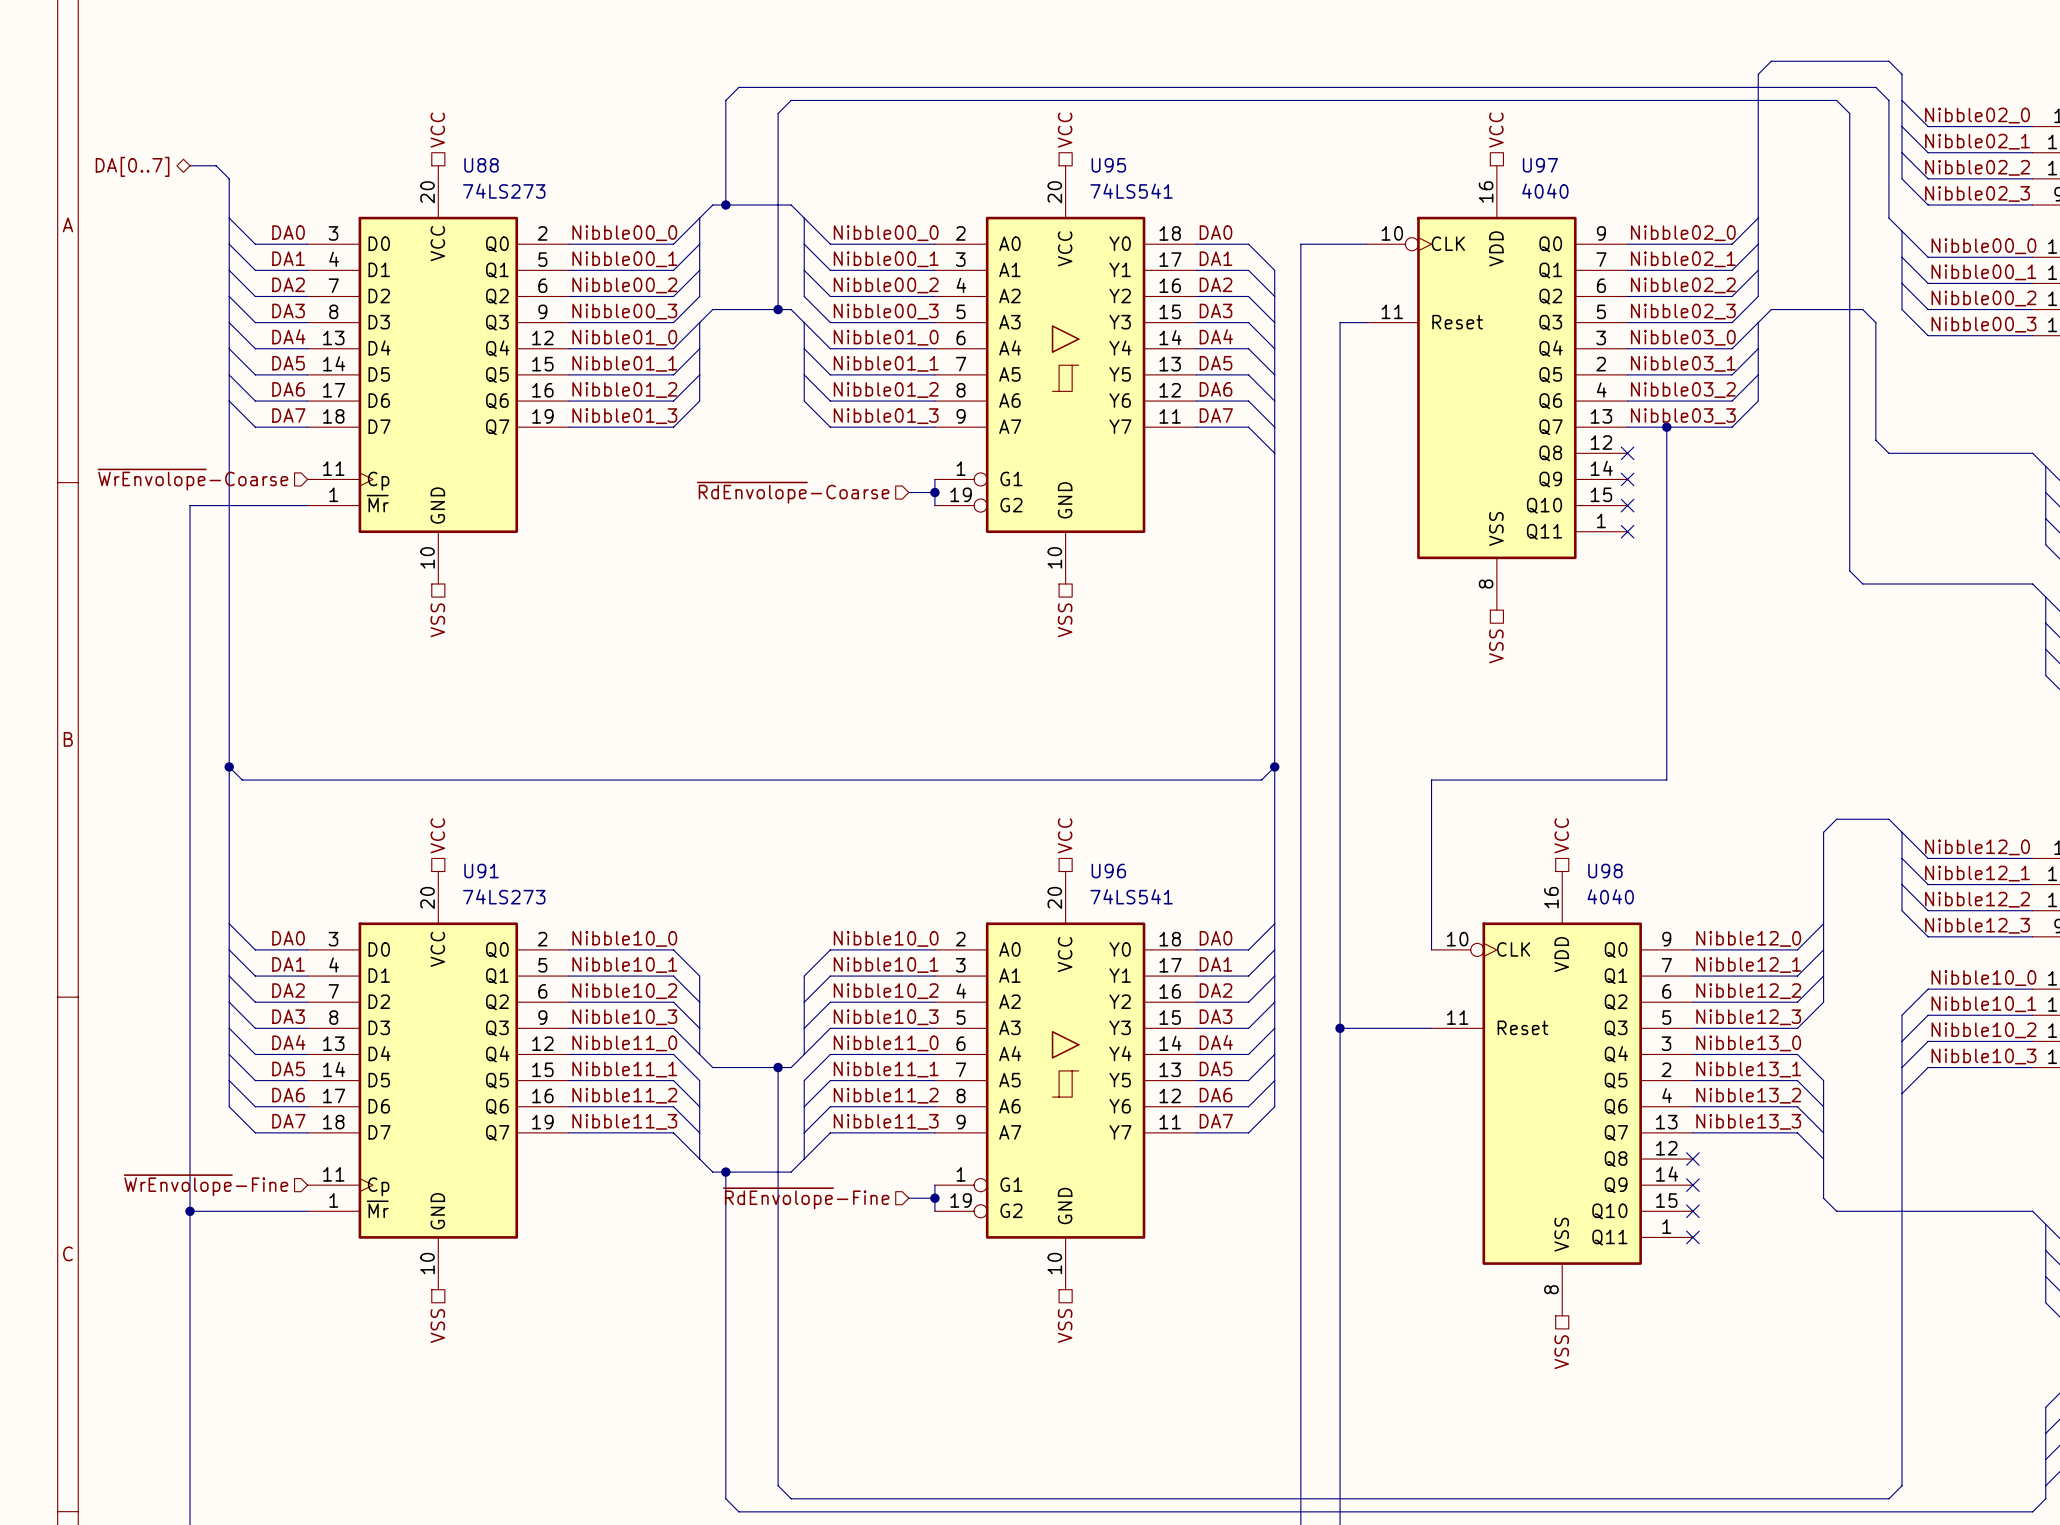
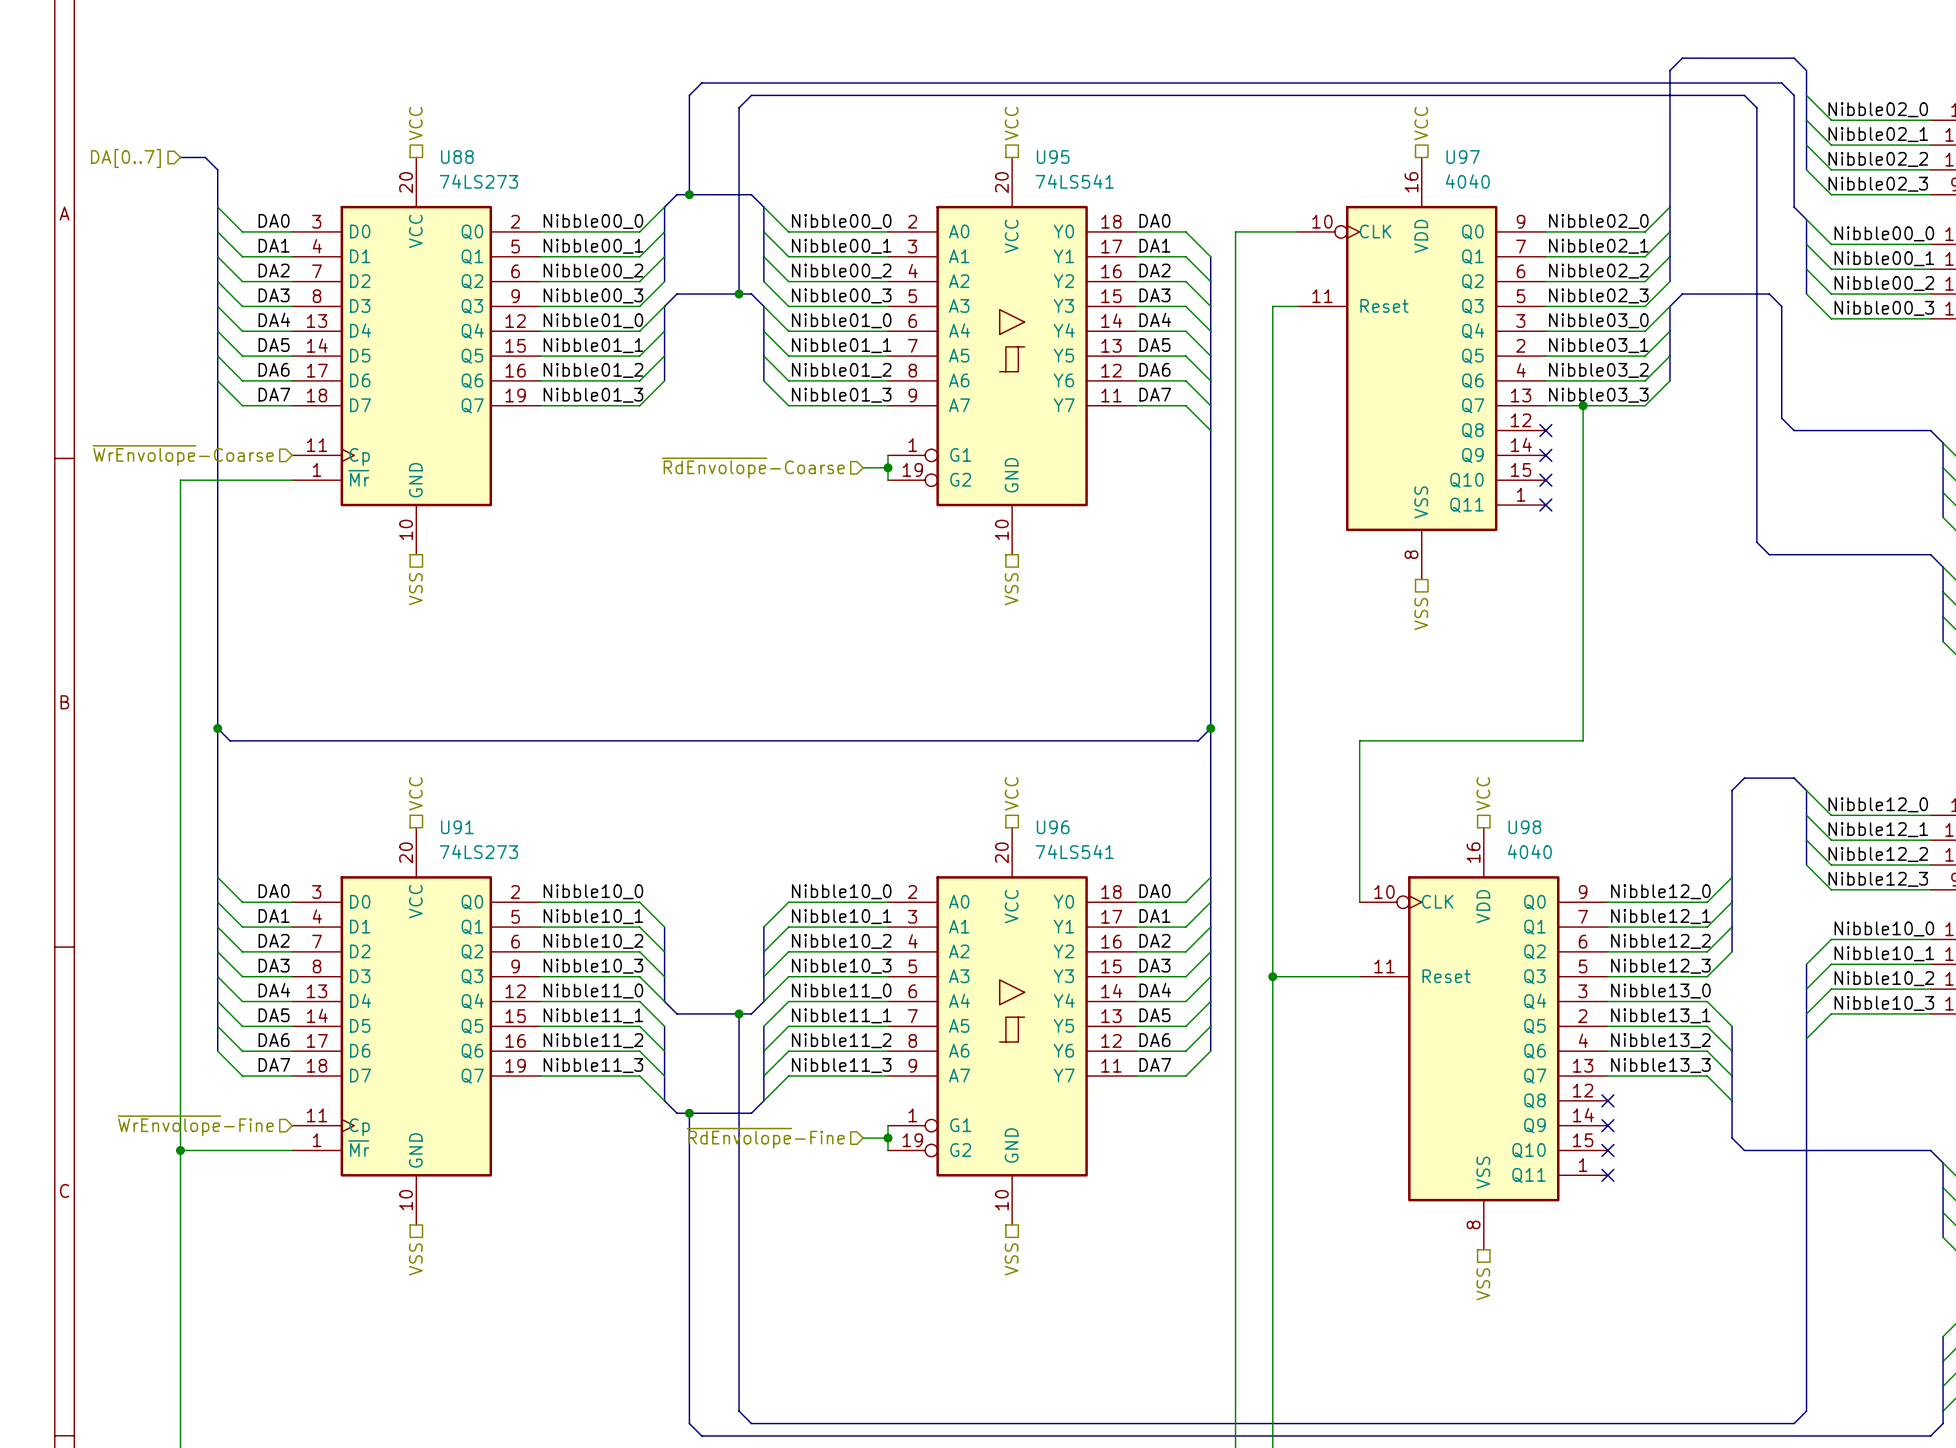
hierarchical label shape: bidirectional (132, 166) -> input (125, 158)

